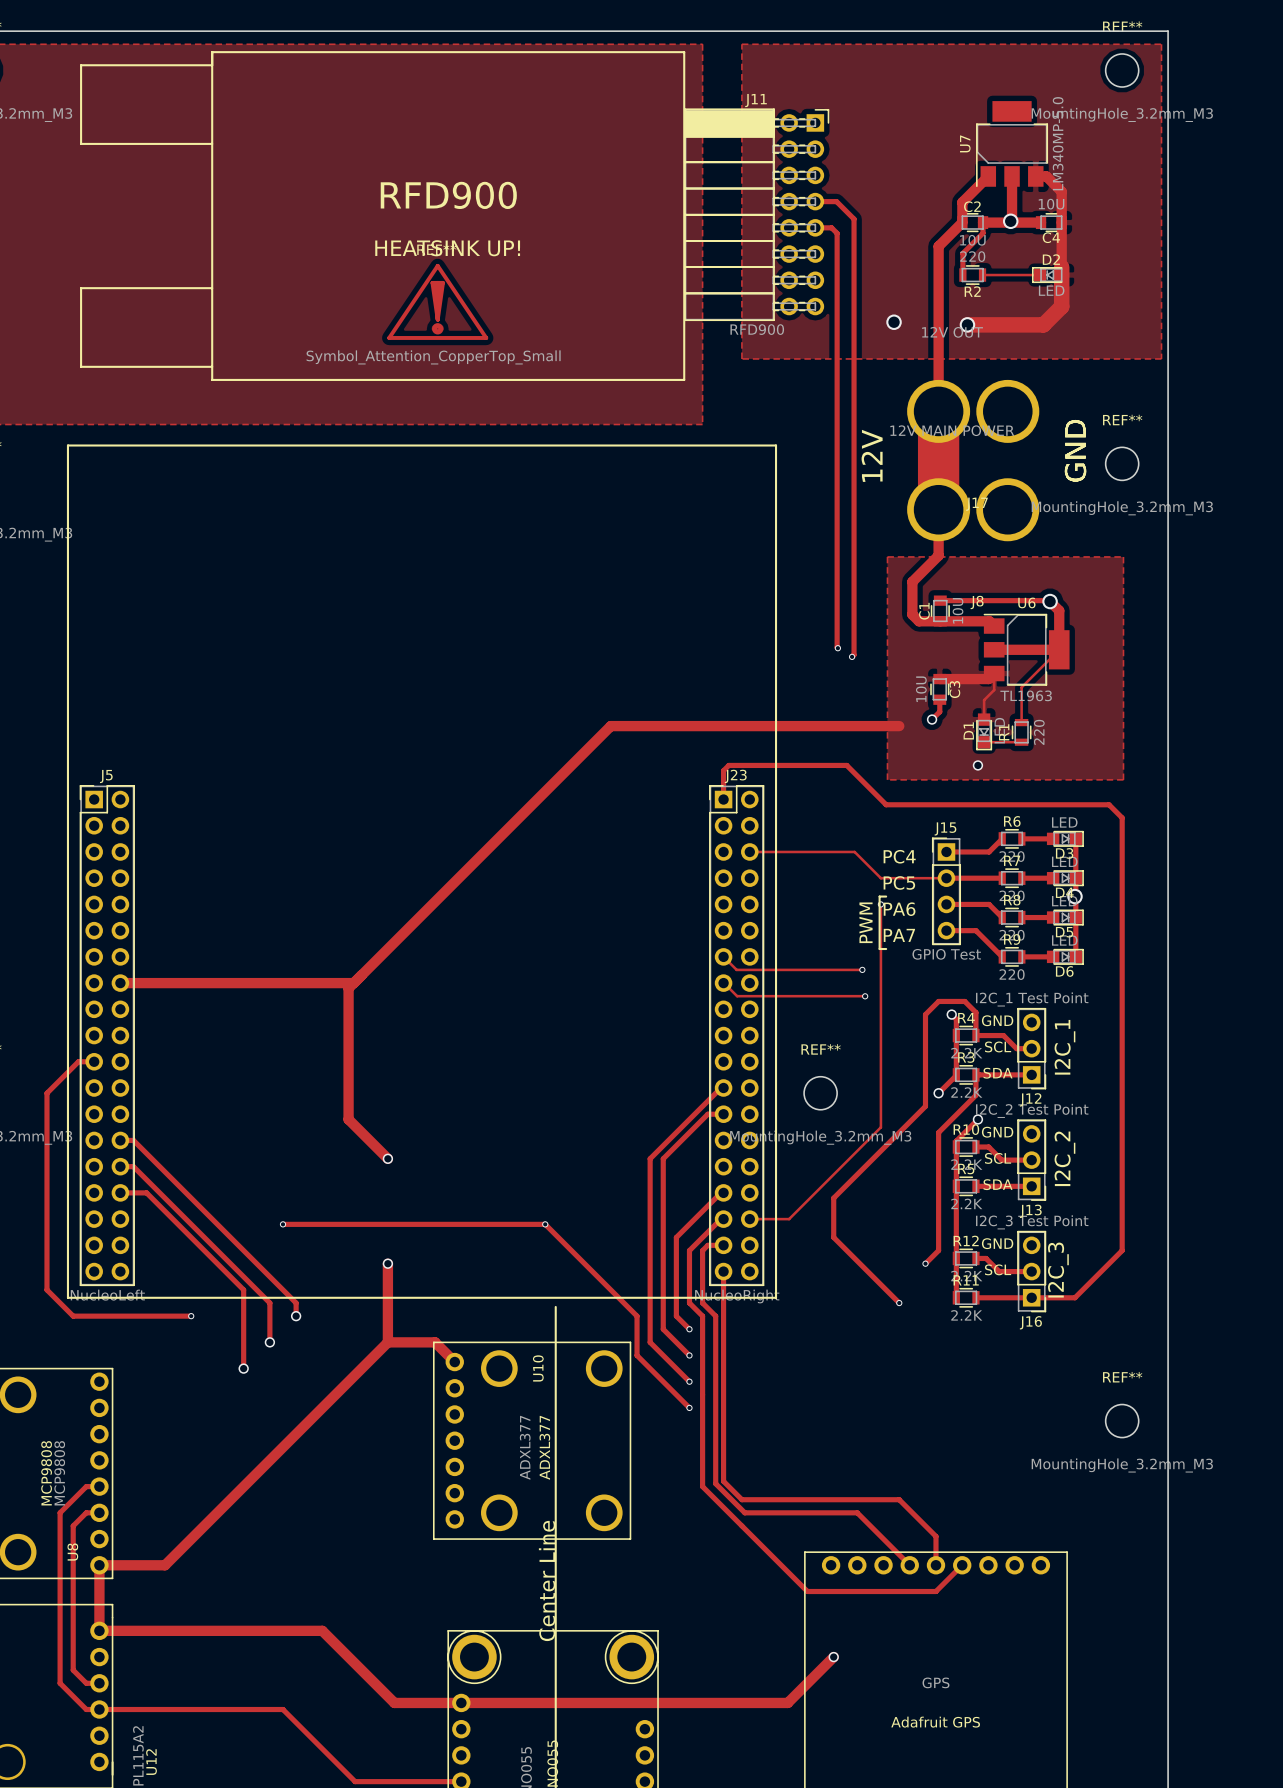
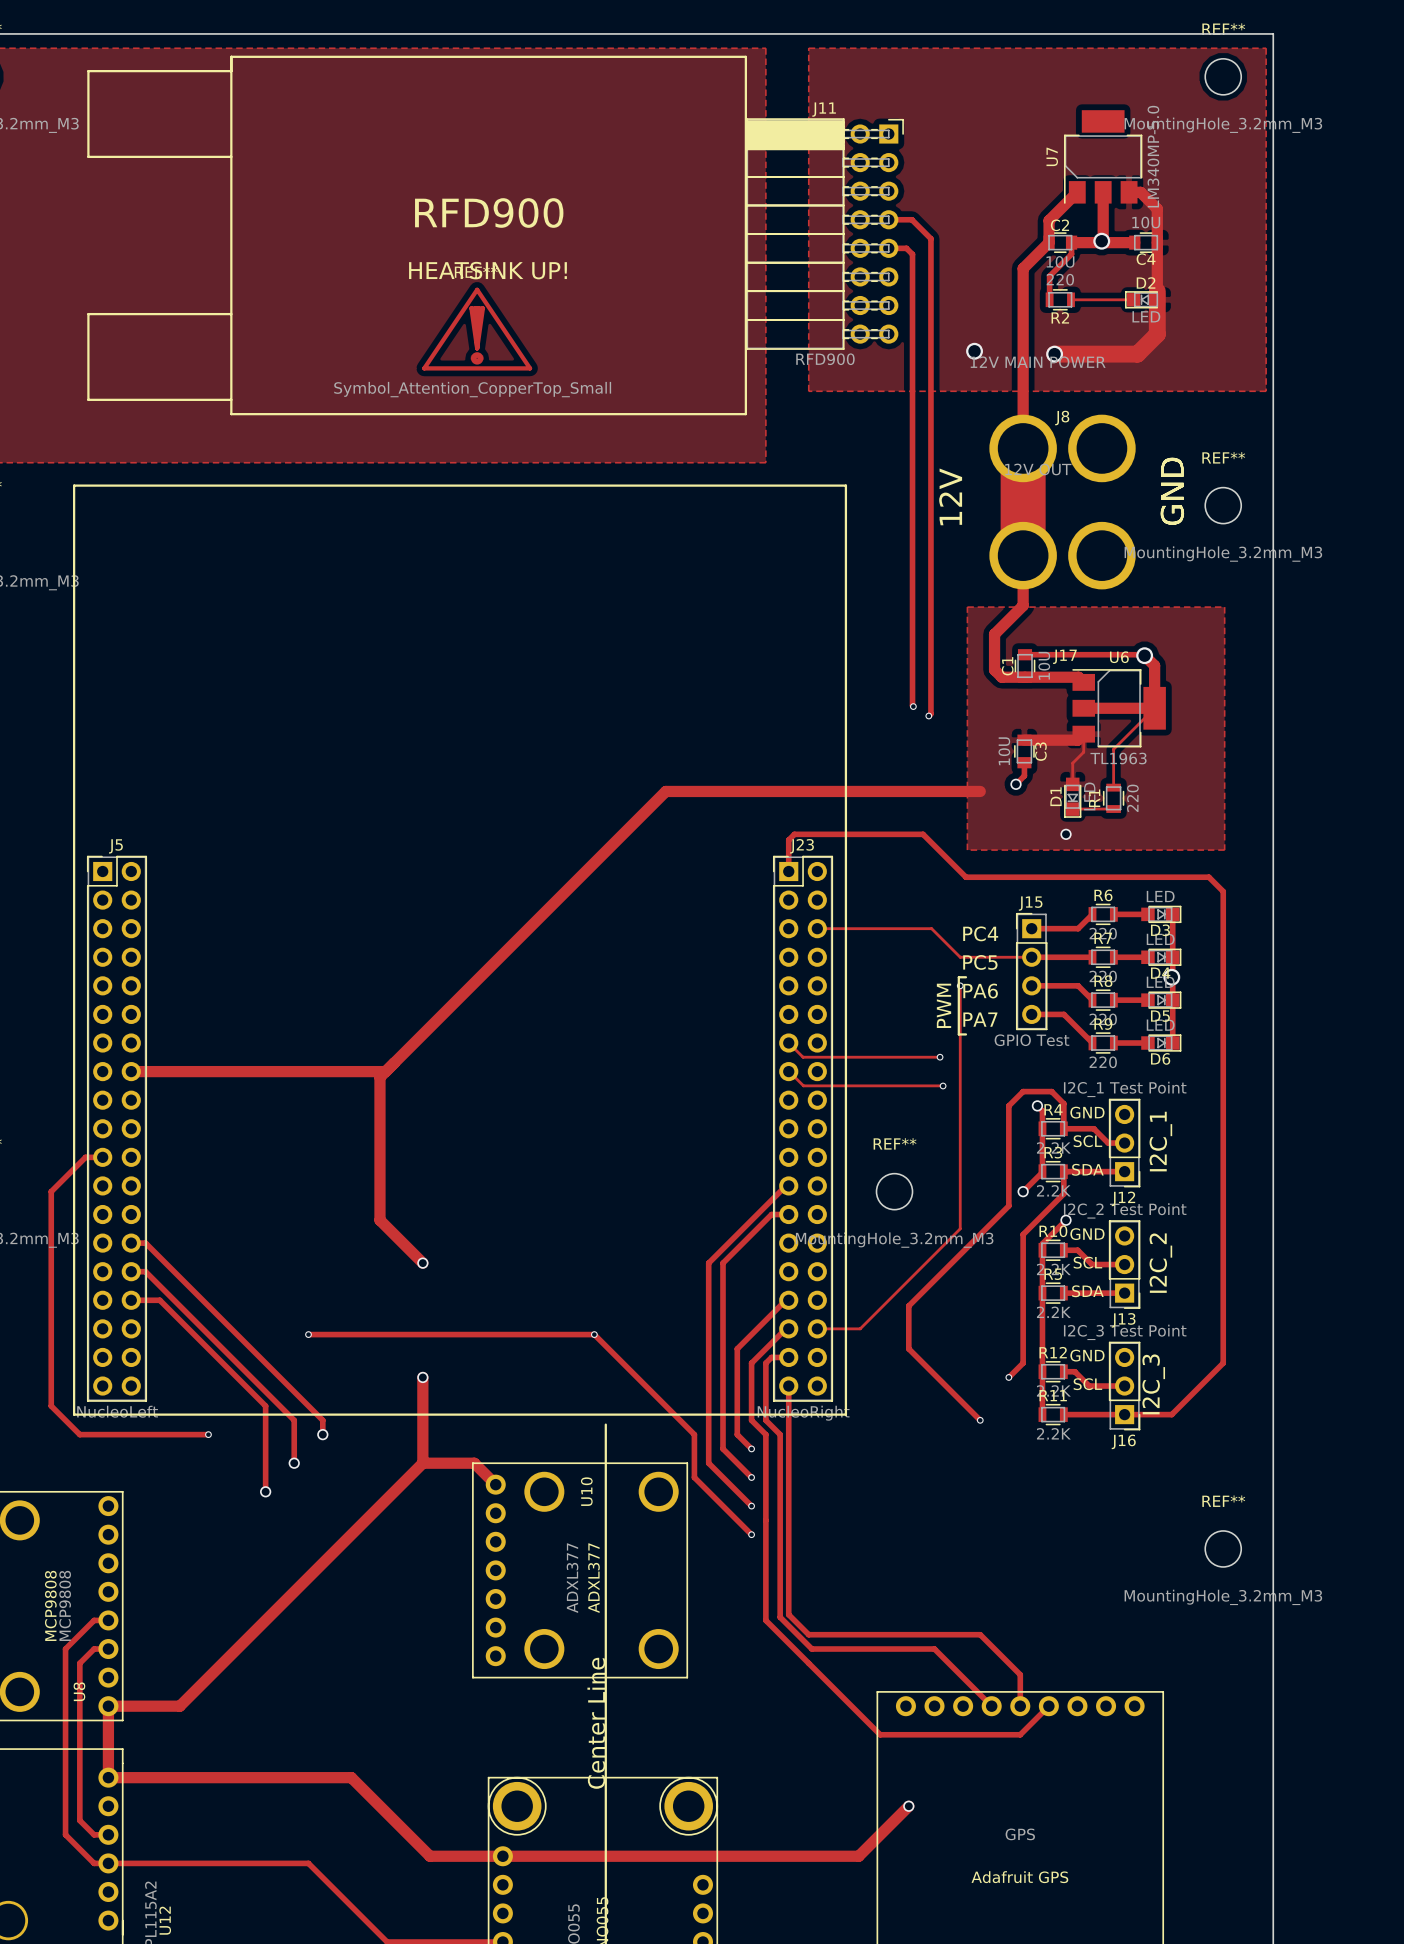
J17 footprint: [907, 379, 1040, 443] -> [989, 521, 1136, 590]
J8 footprint: [907, 478, 1040, 542] -> [989, 414, 1136, 483]
J8 name position: J8 (977, 602) -> J8 (1062, 418)

